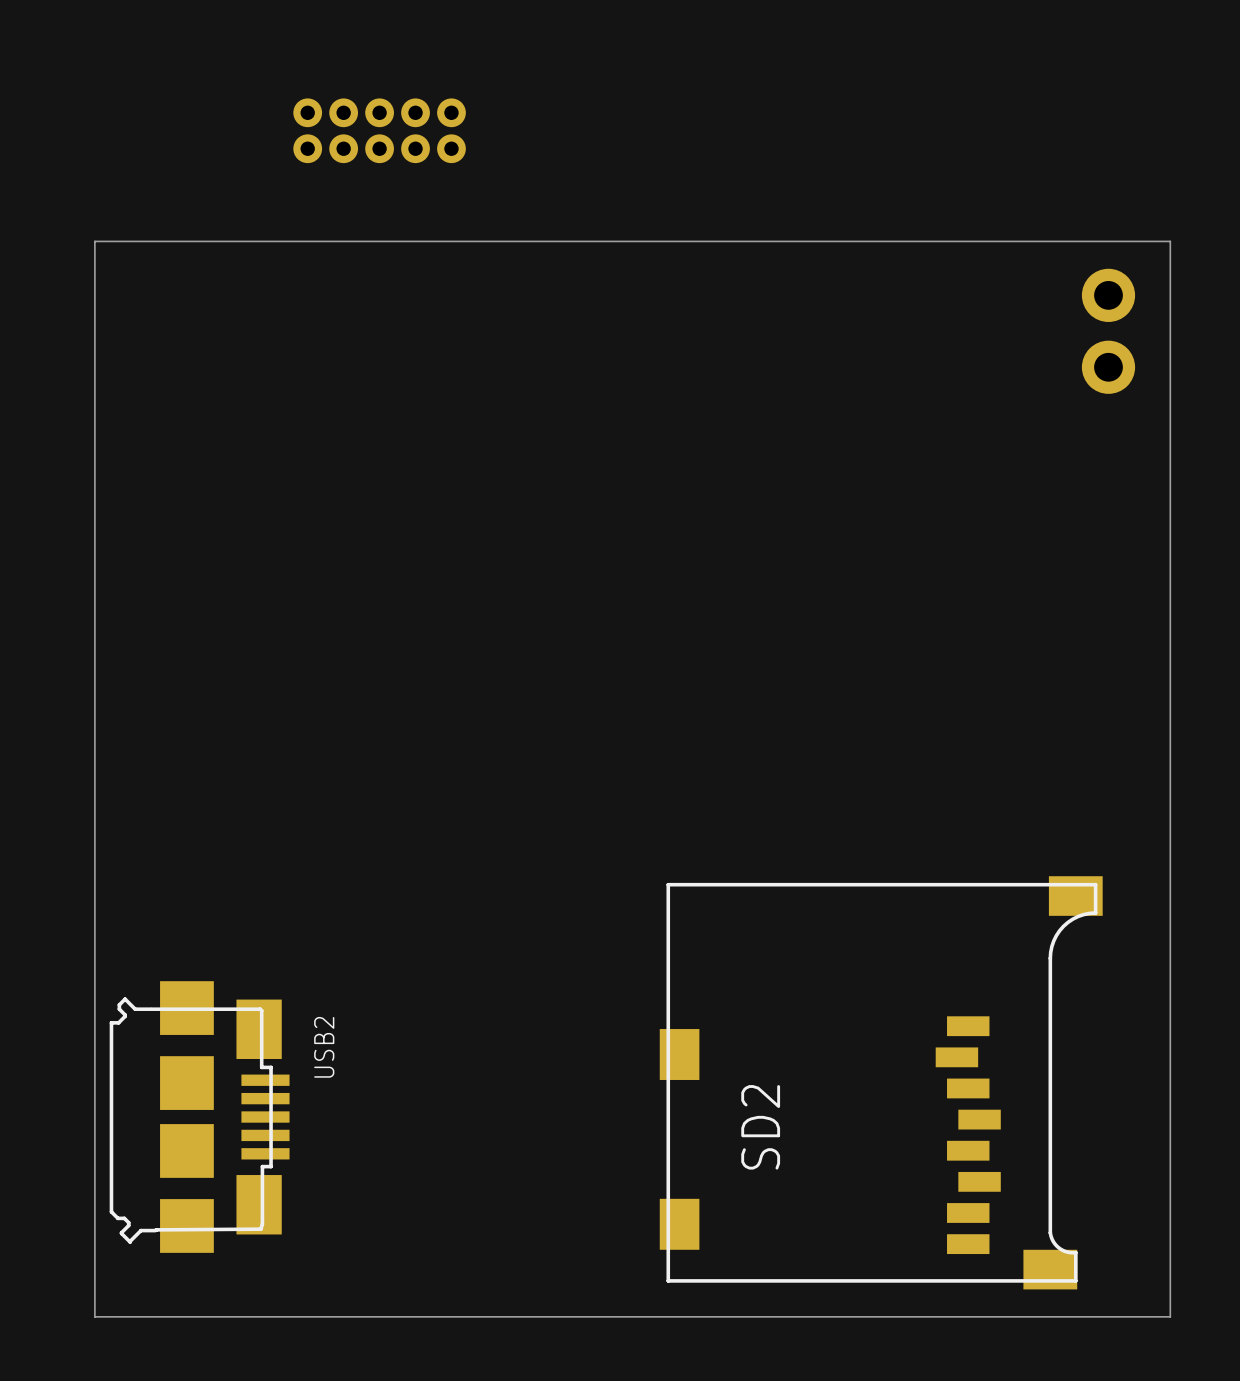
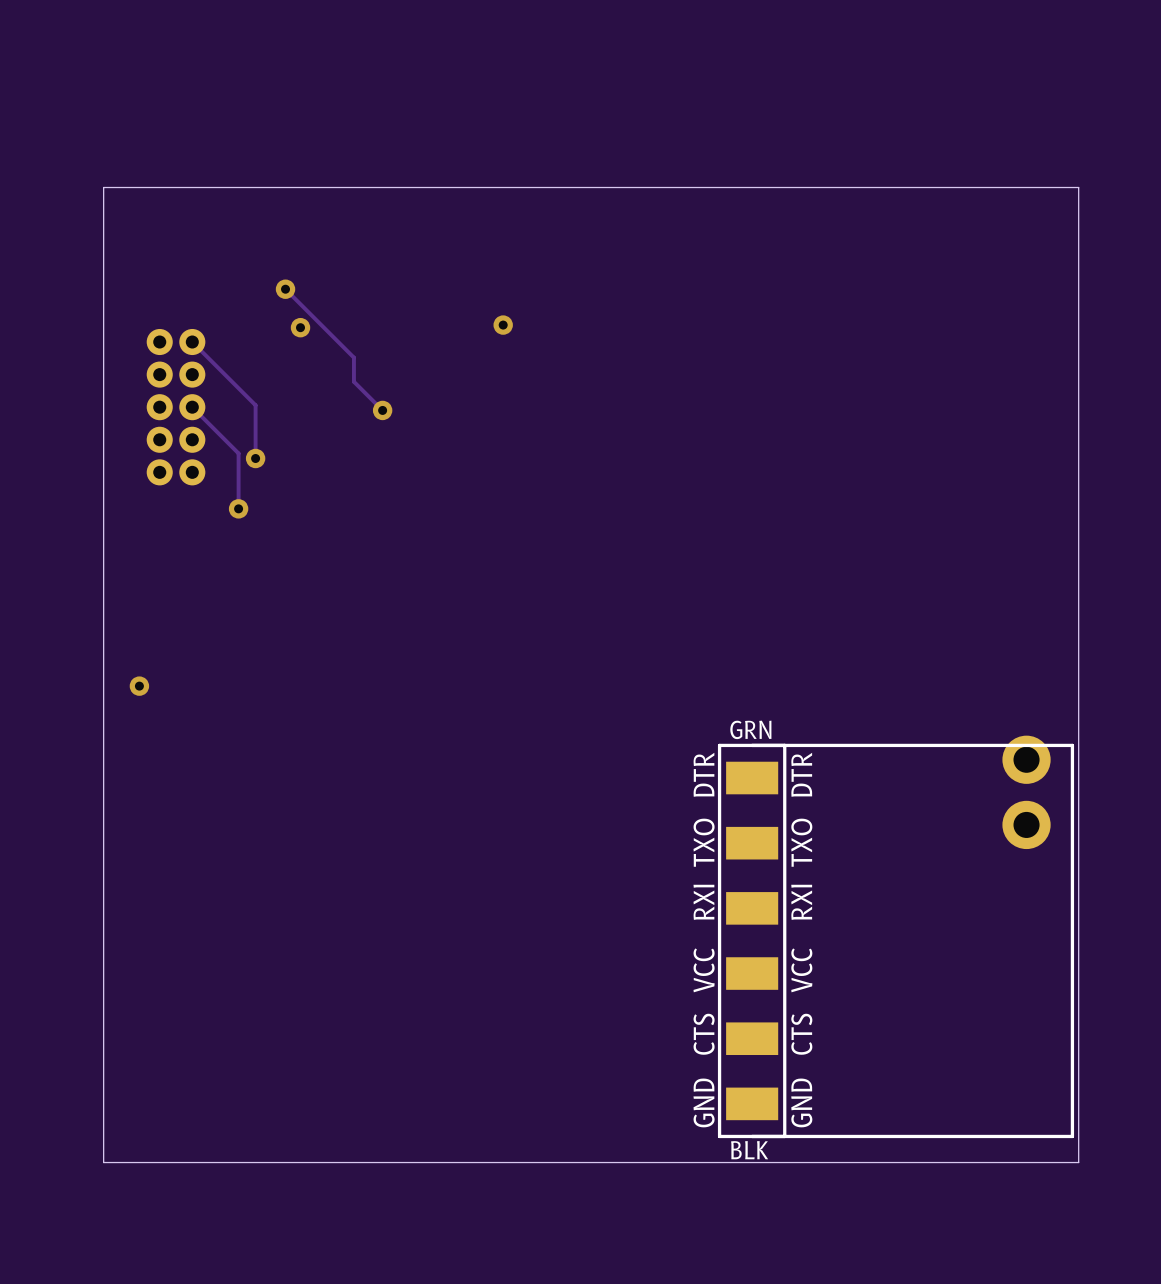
part rotation: 0° (379, 130) -> 90° clockwise (176, 407)
part position: (379, 130) -> (176, 407)
part position: (1108, 331) -> (1026, 792)
track: none -> (285, 289) (353, 357) (353, 381) (382, 410)
via: none -> (285, 289)
via: none -> (503, 325)
via: none -> (300, 327)
track: none -> (192, 342) (255, 405) (255, 458)
track: none -> (192, 407) (238, 453) (238, 508)
via: none -> (382, 410)
via: none -> (255, 458)
via: none -> (238, 508)
via: none -> (139, 686)
part: none -> (895, 940)
SD2: (881, 1082) -> none
USB2: (199, 1117) -> none

